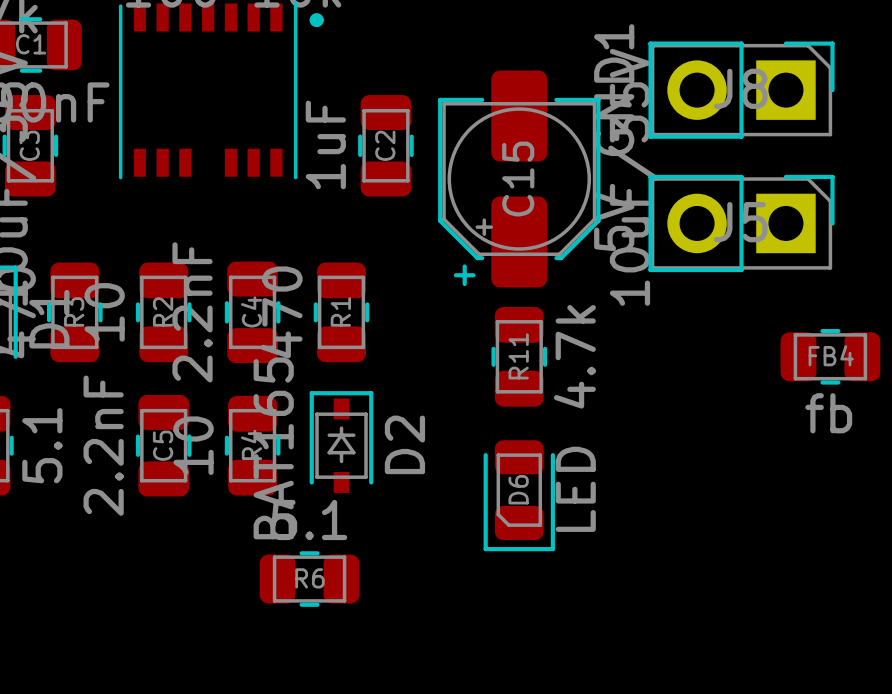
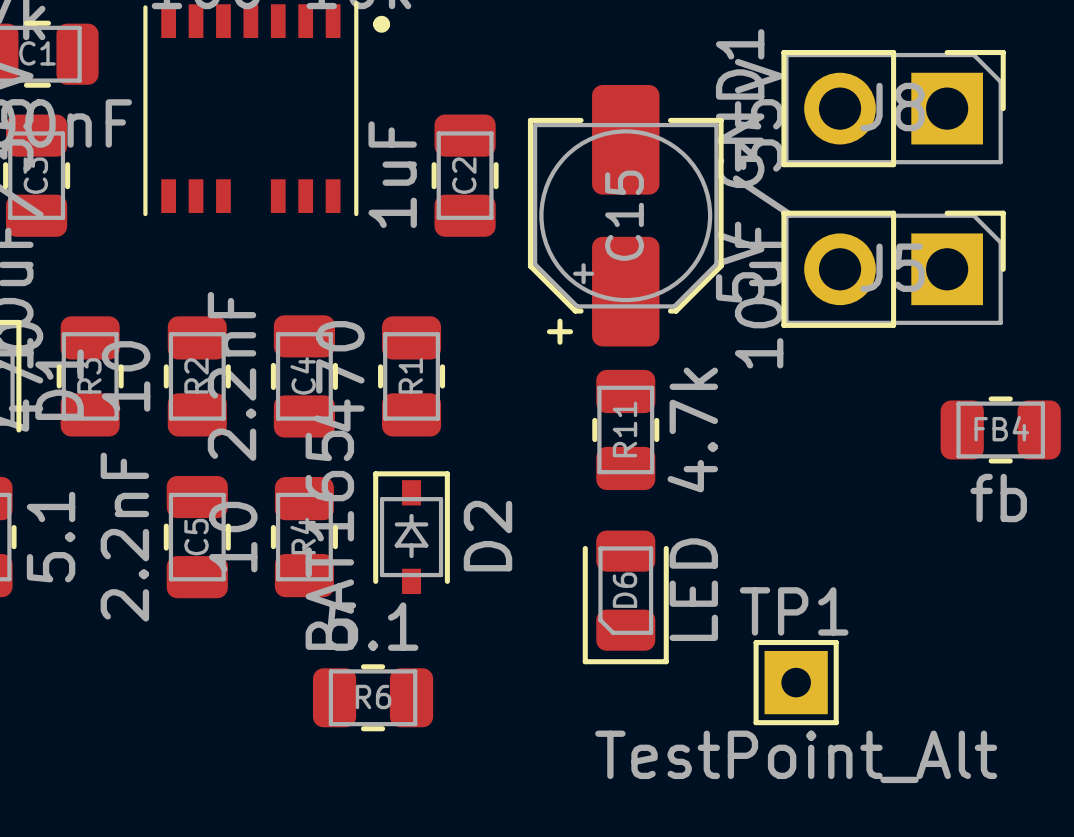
TP1: none -> TestPoint_Alt (796, 682)

